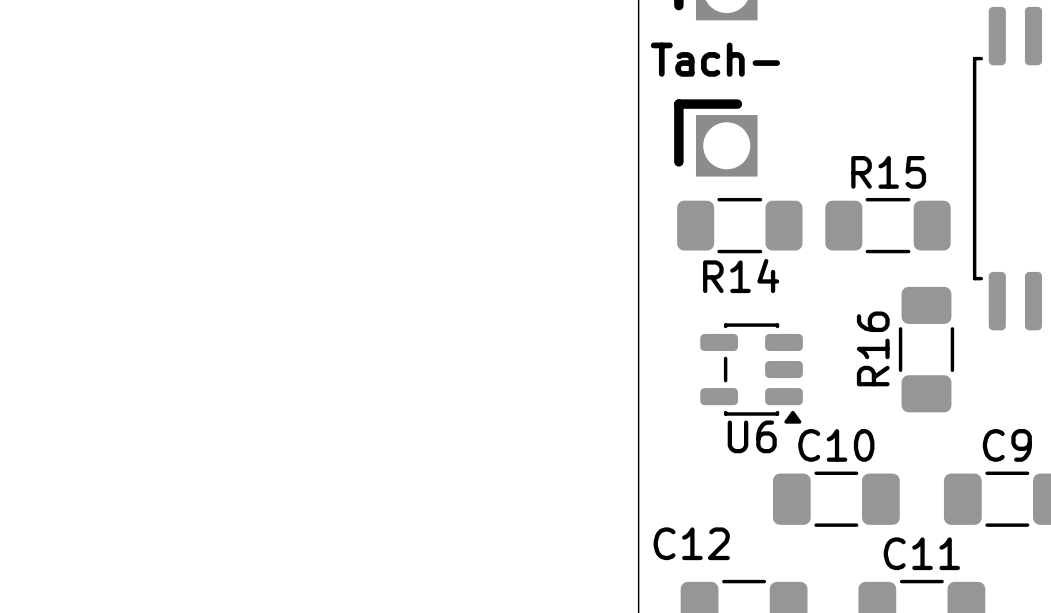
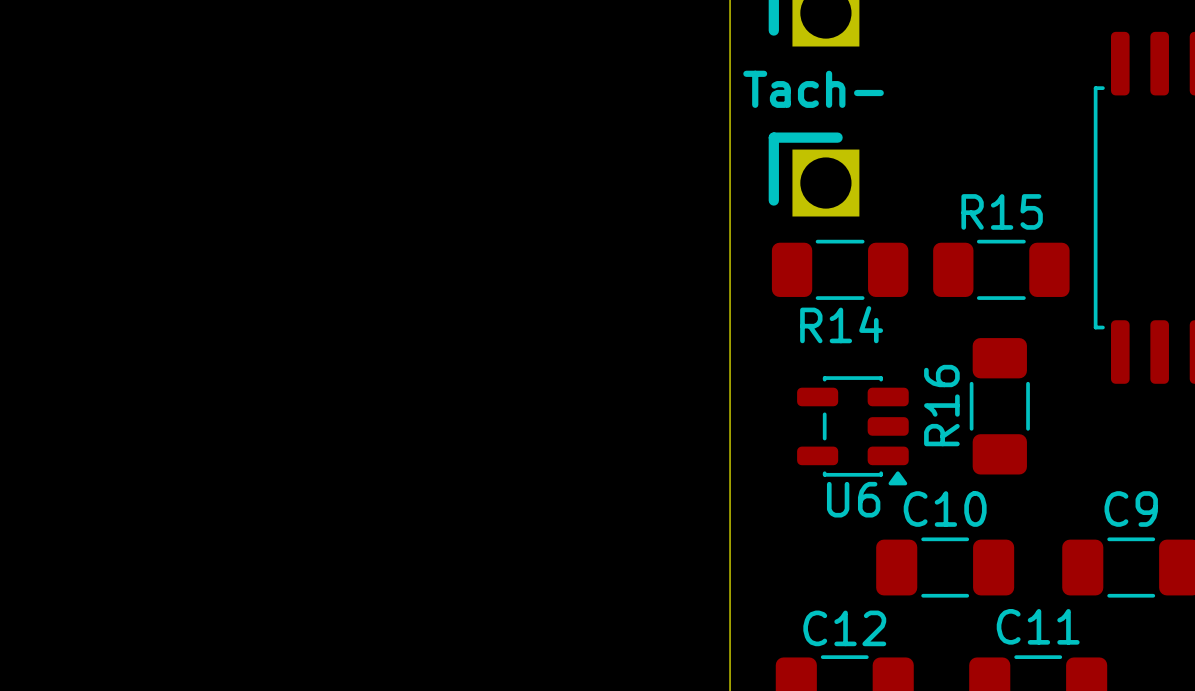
R16 position: (926, 349) -> (999, 406)
C12 name position: C12 (691, 543) -> C12 (844, 628)

